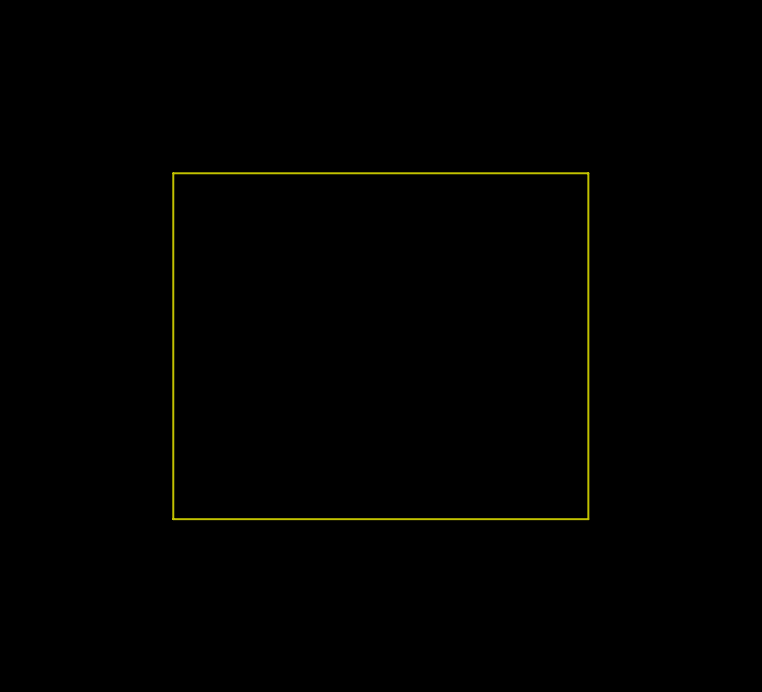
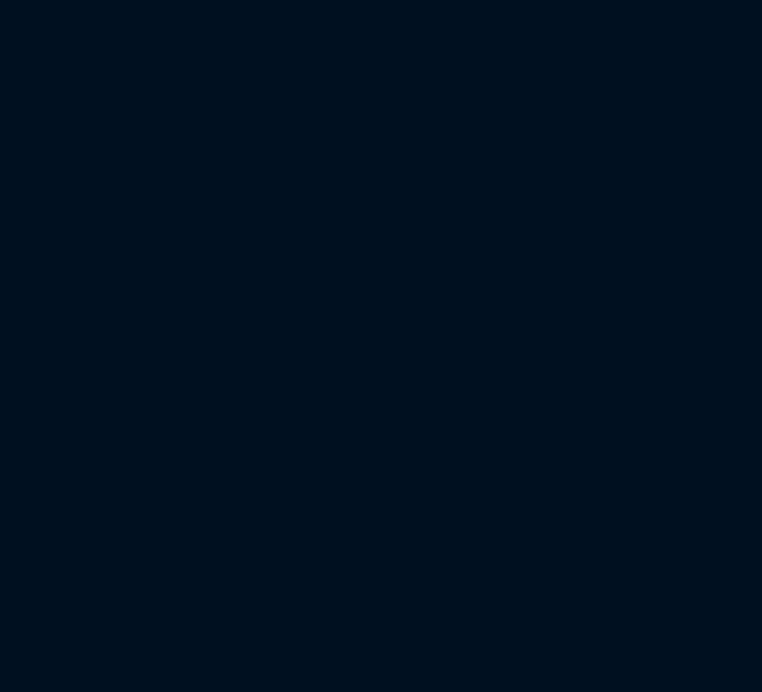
board edge: (588, 173) (588, 519) (173, 519) (173, 173) (588, 173) -> none

